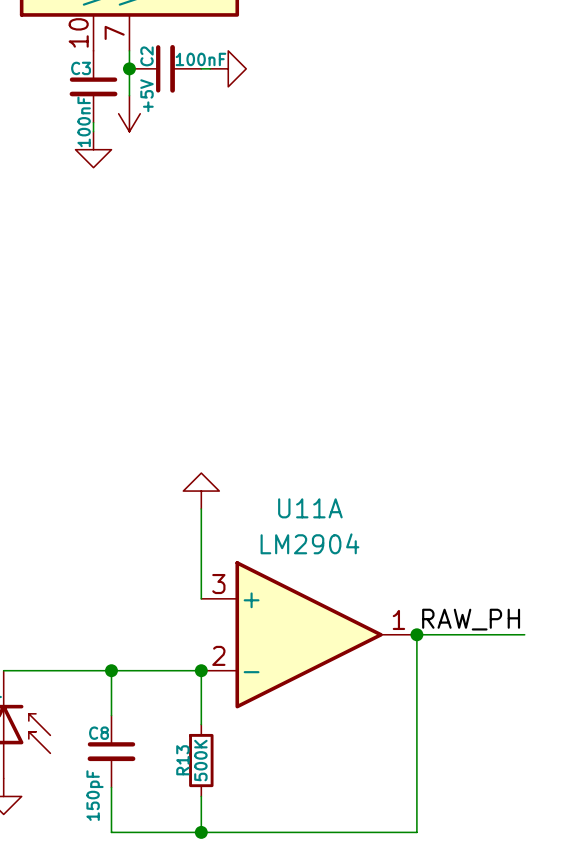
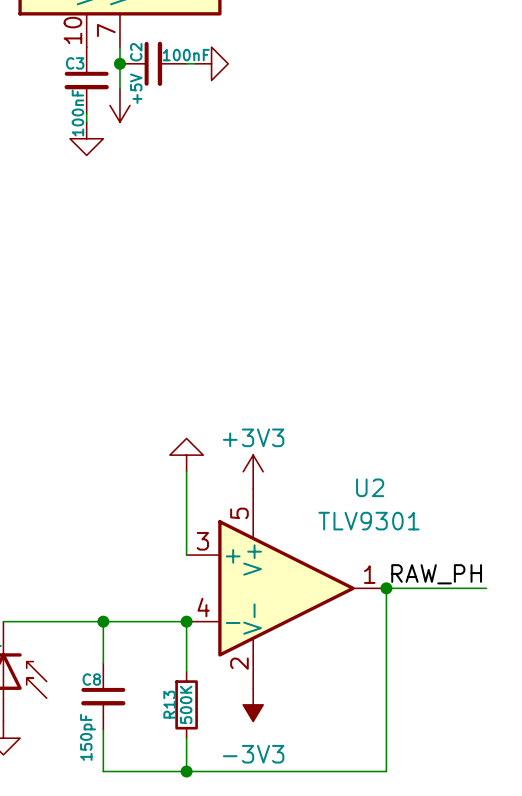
power symbol: none -> +3V3 (253, 471)
U11A: LM2904 (309, 634) -> none
U2: none -> TLV9301 (286, 588)
power symbol: none -> -3V3 (253, 704)

